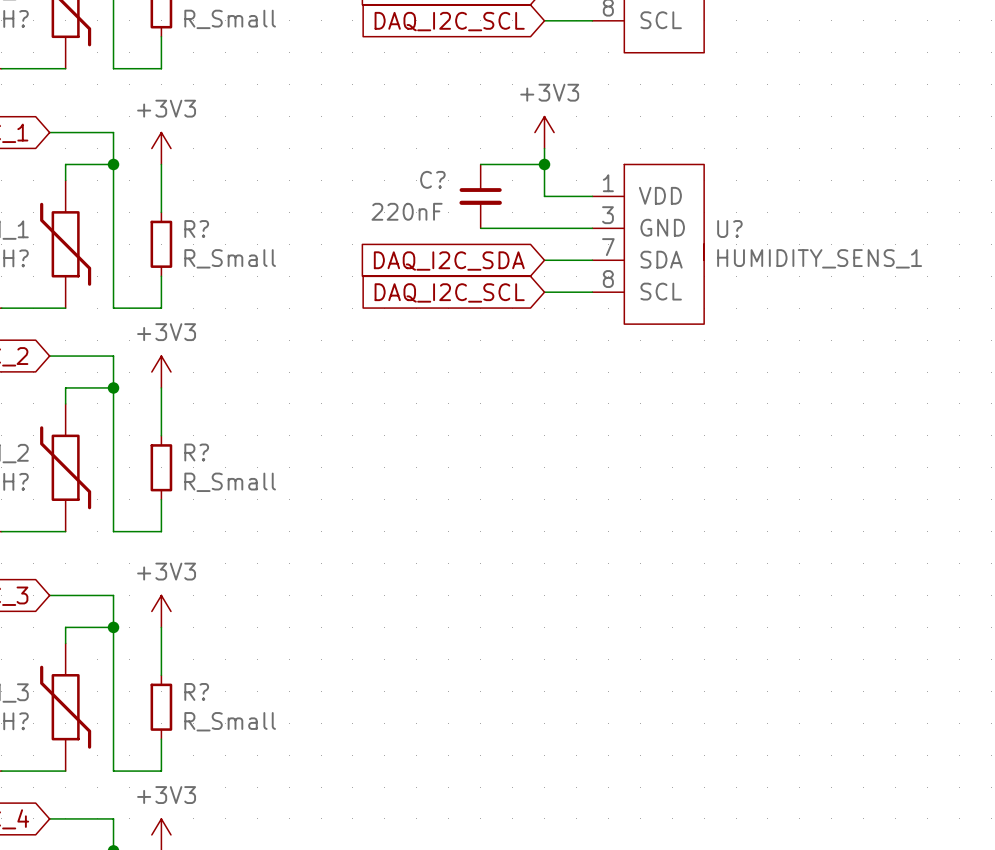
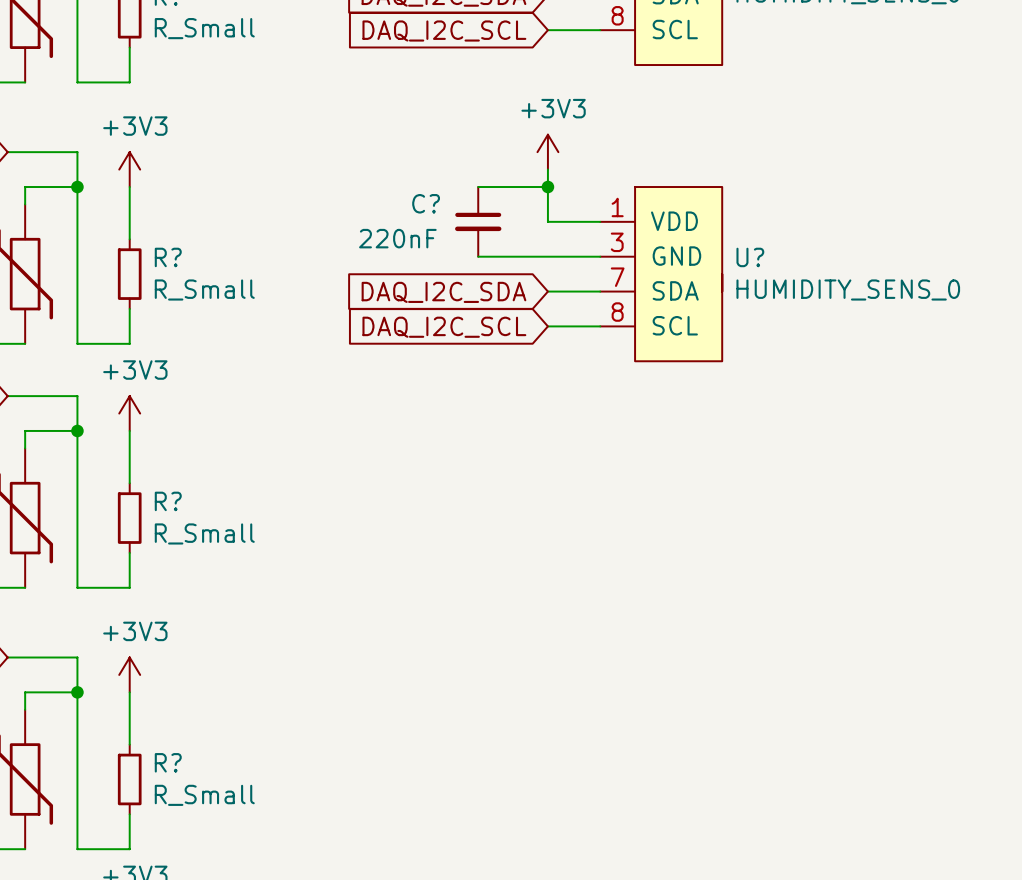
U? value: HUMIDITY_SENS_1 (819, 258) -> HUMIDITY_SENS_0 (848, 289)

